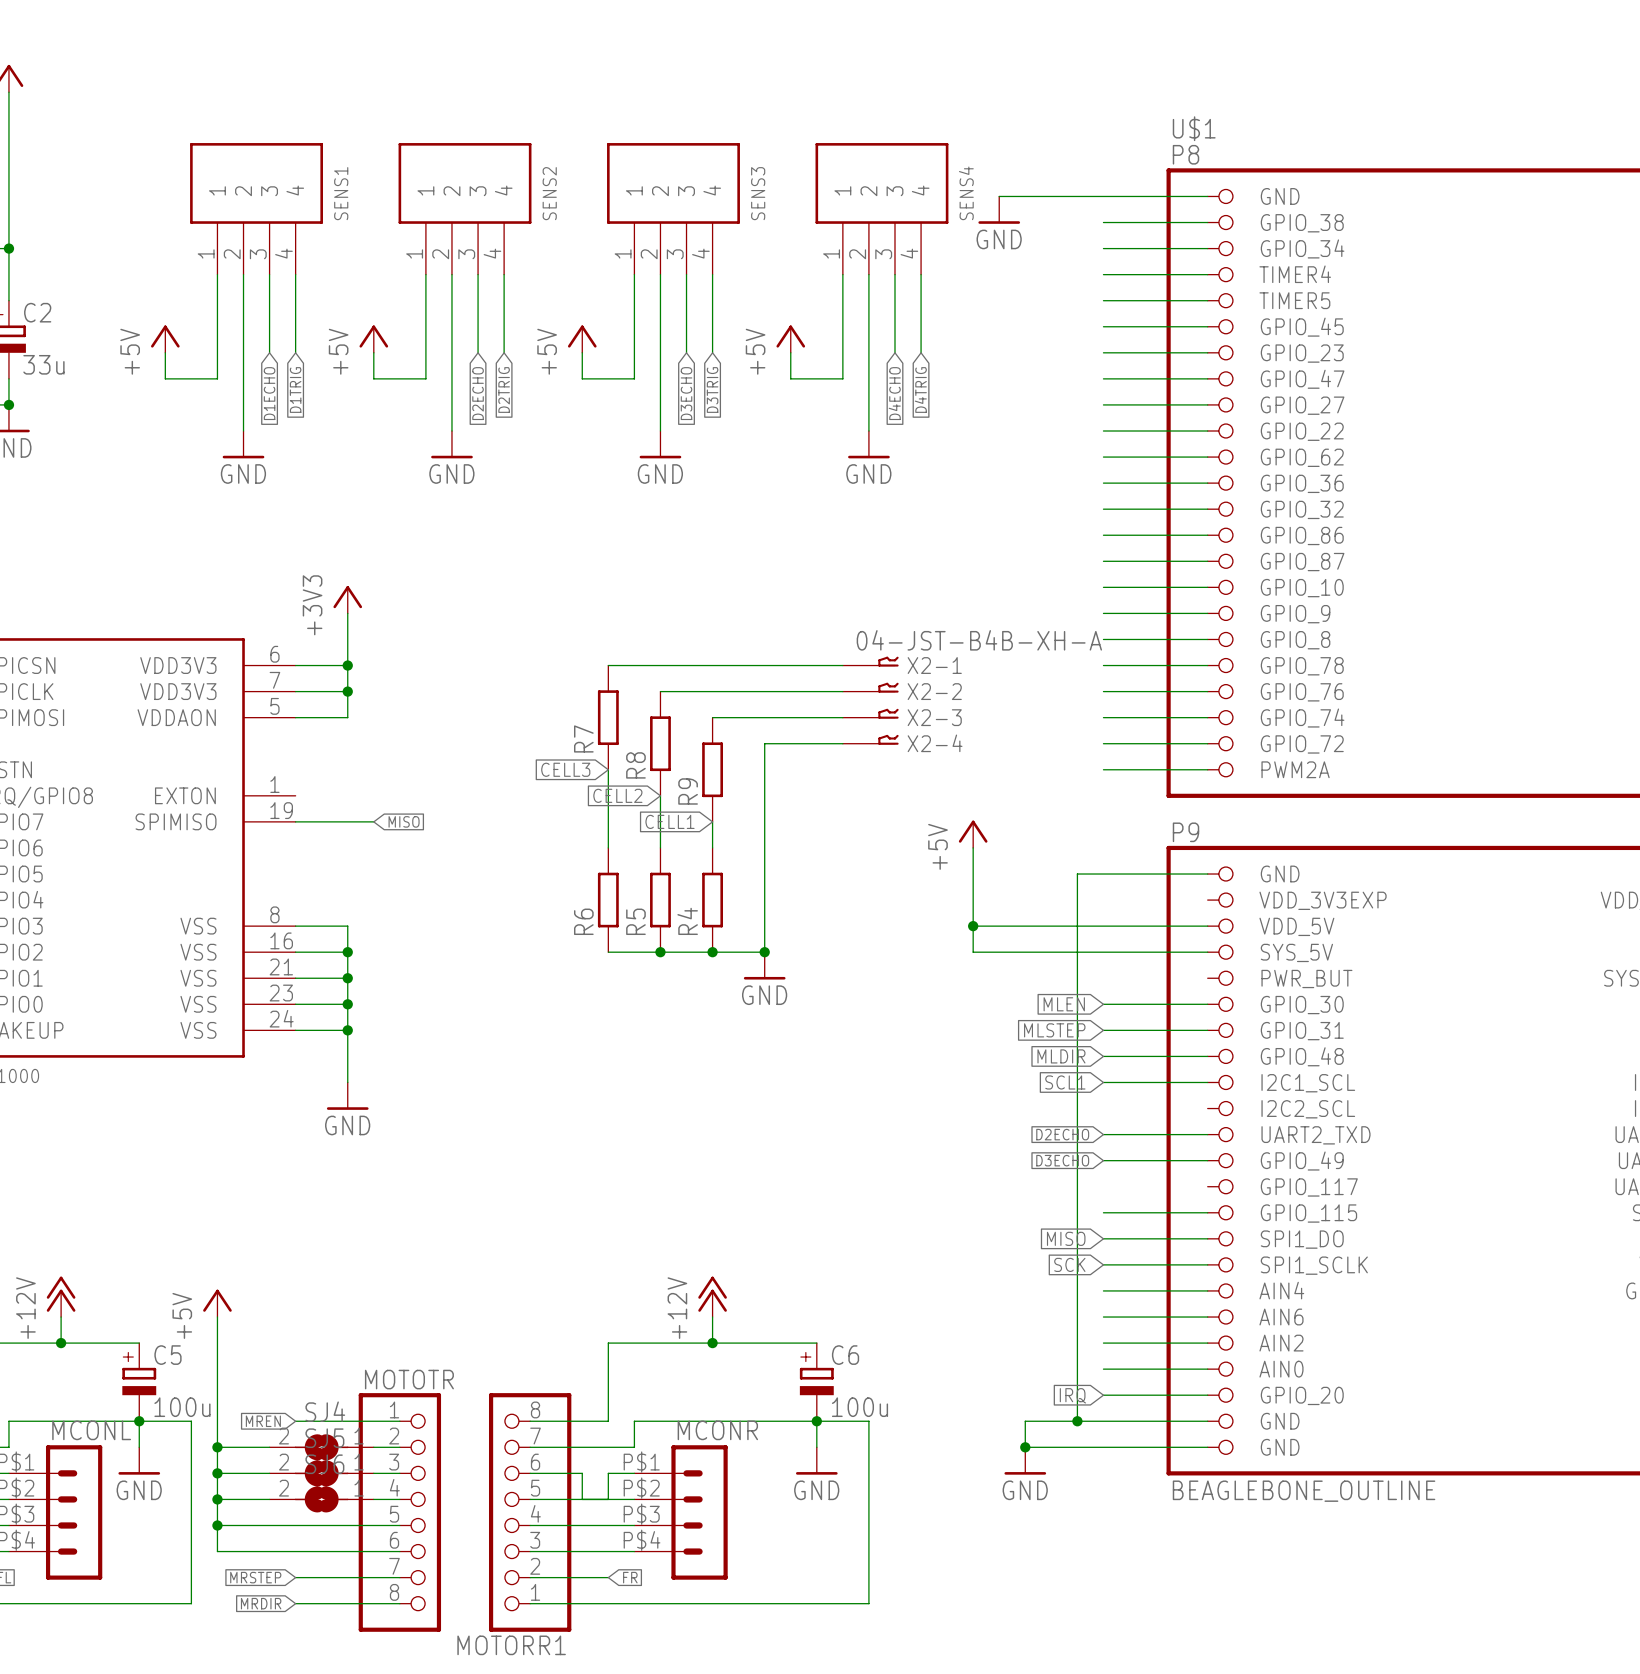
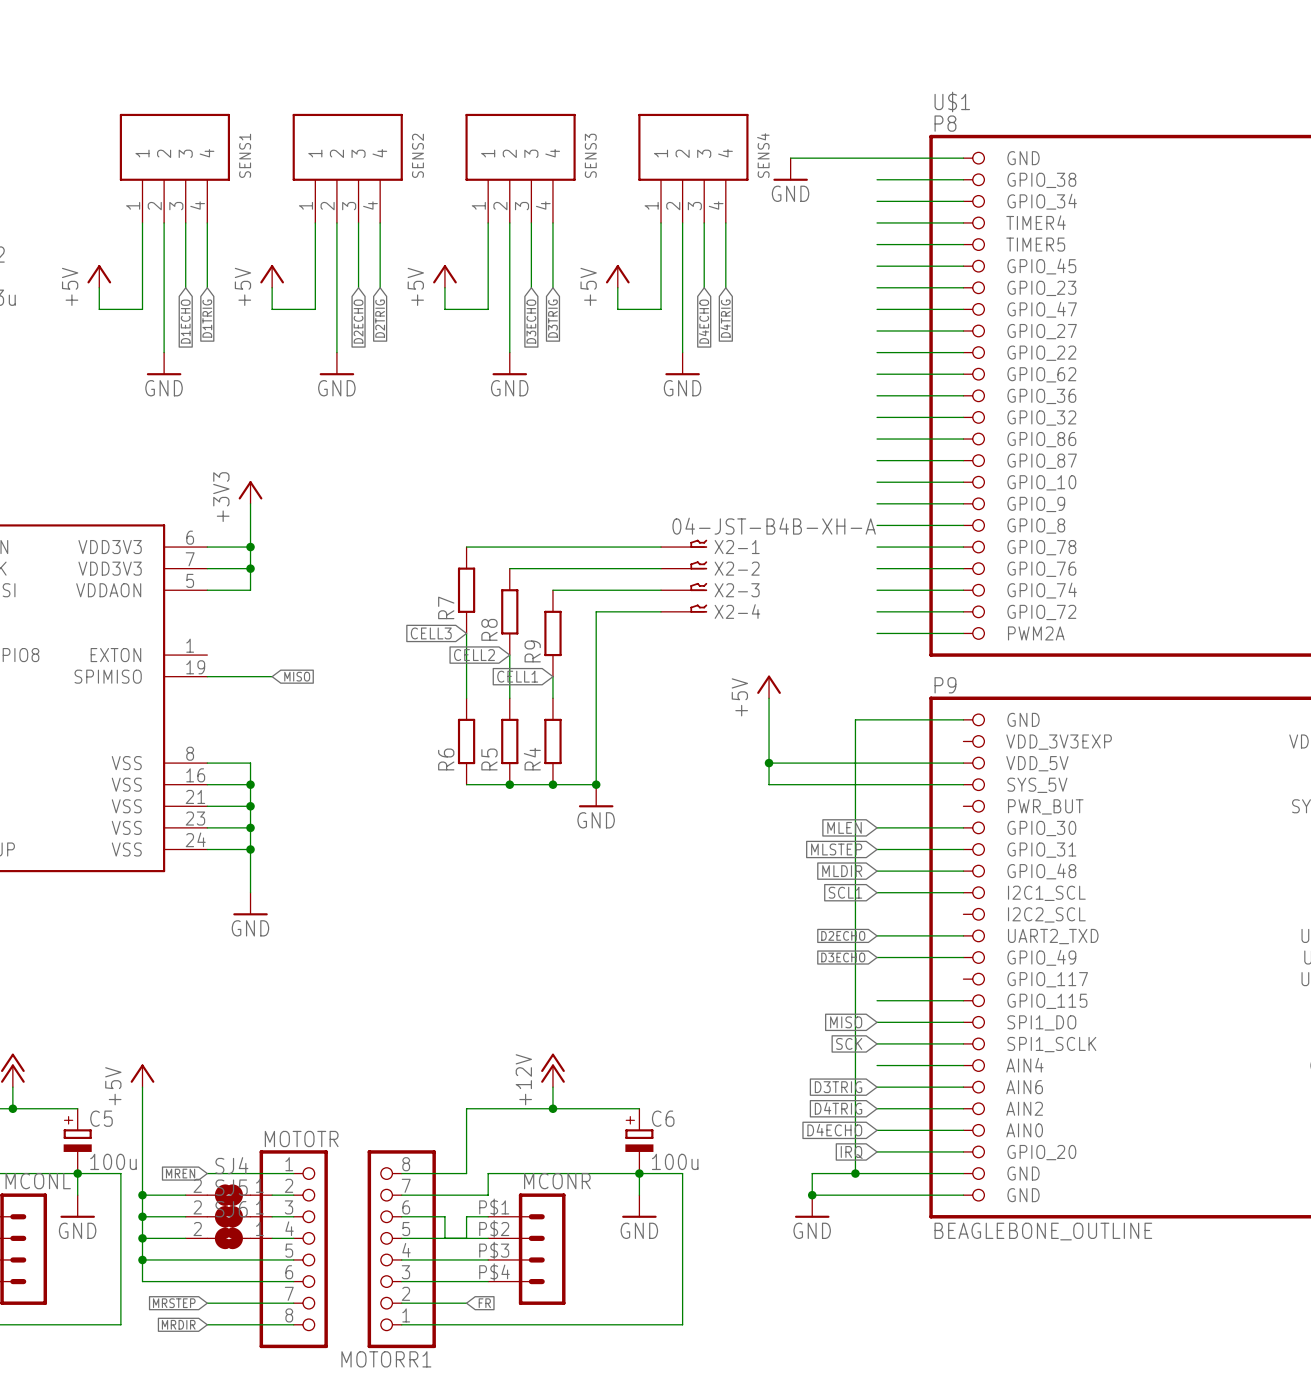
global label: none -> D3TRIG (838, 1087)
global label: none -> D4TRIG (838, 1108)
global label: none -> D4ECHO (834, 1130)

